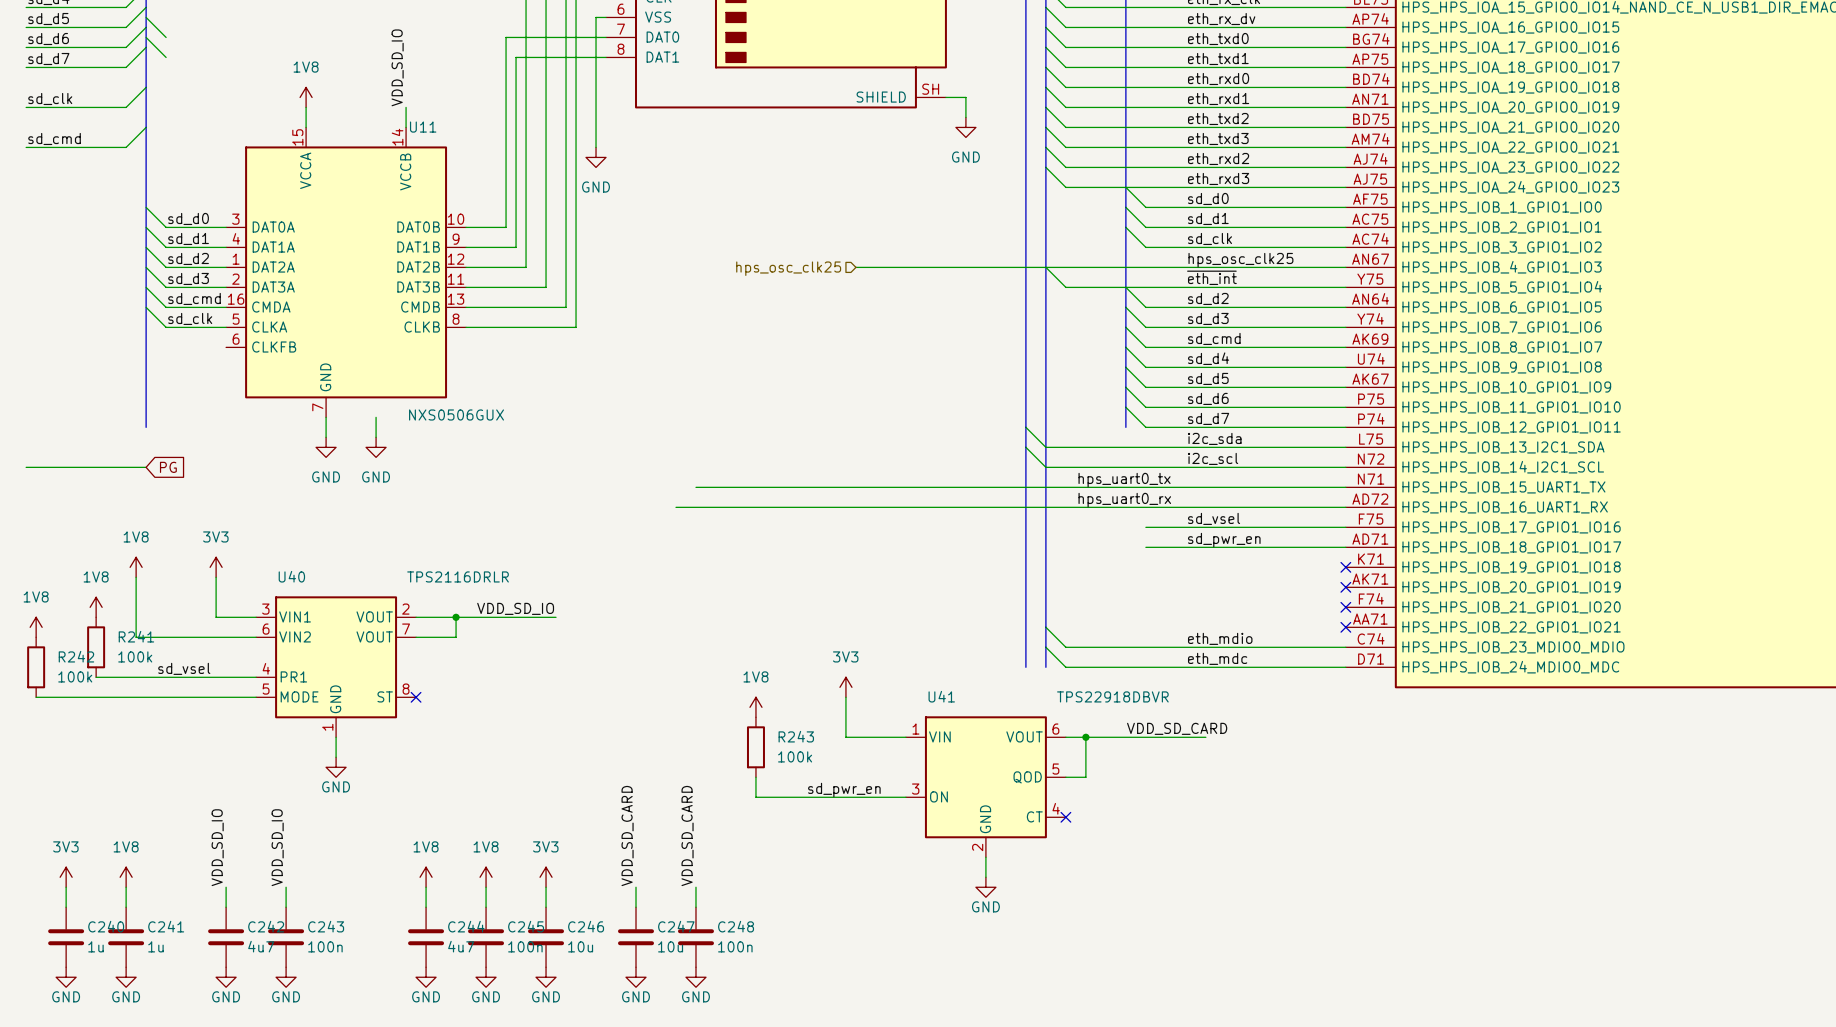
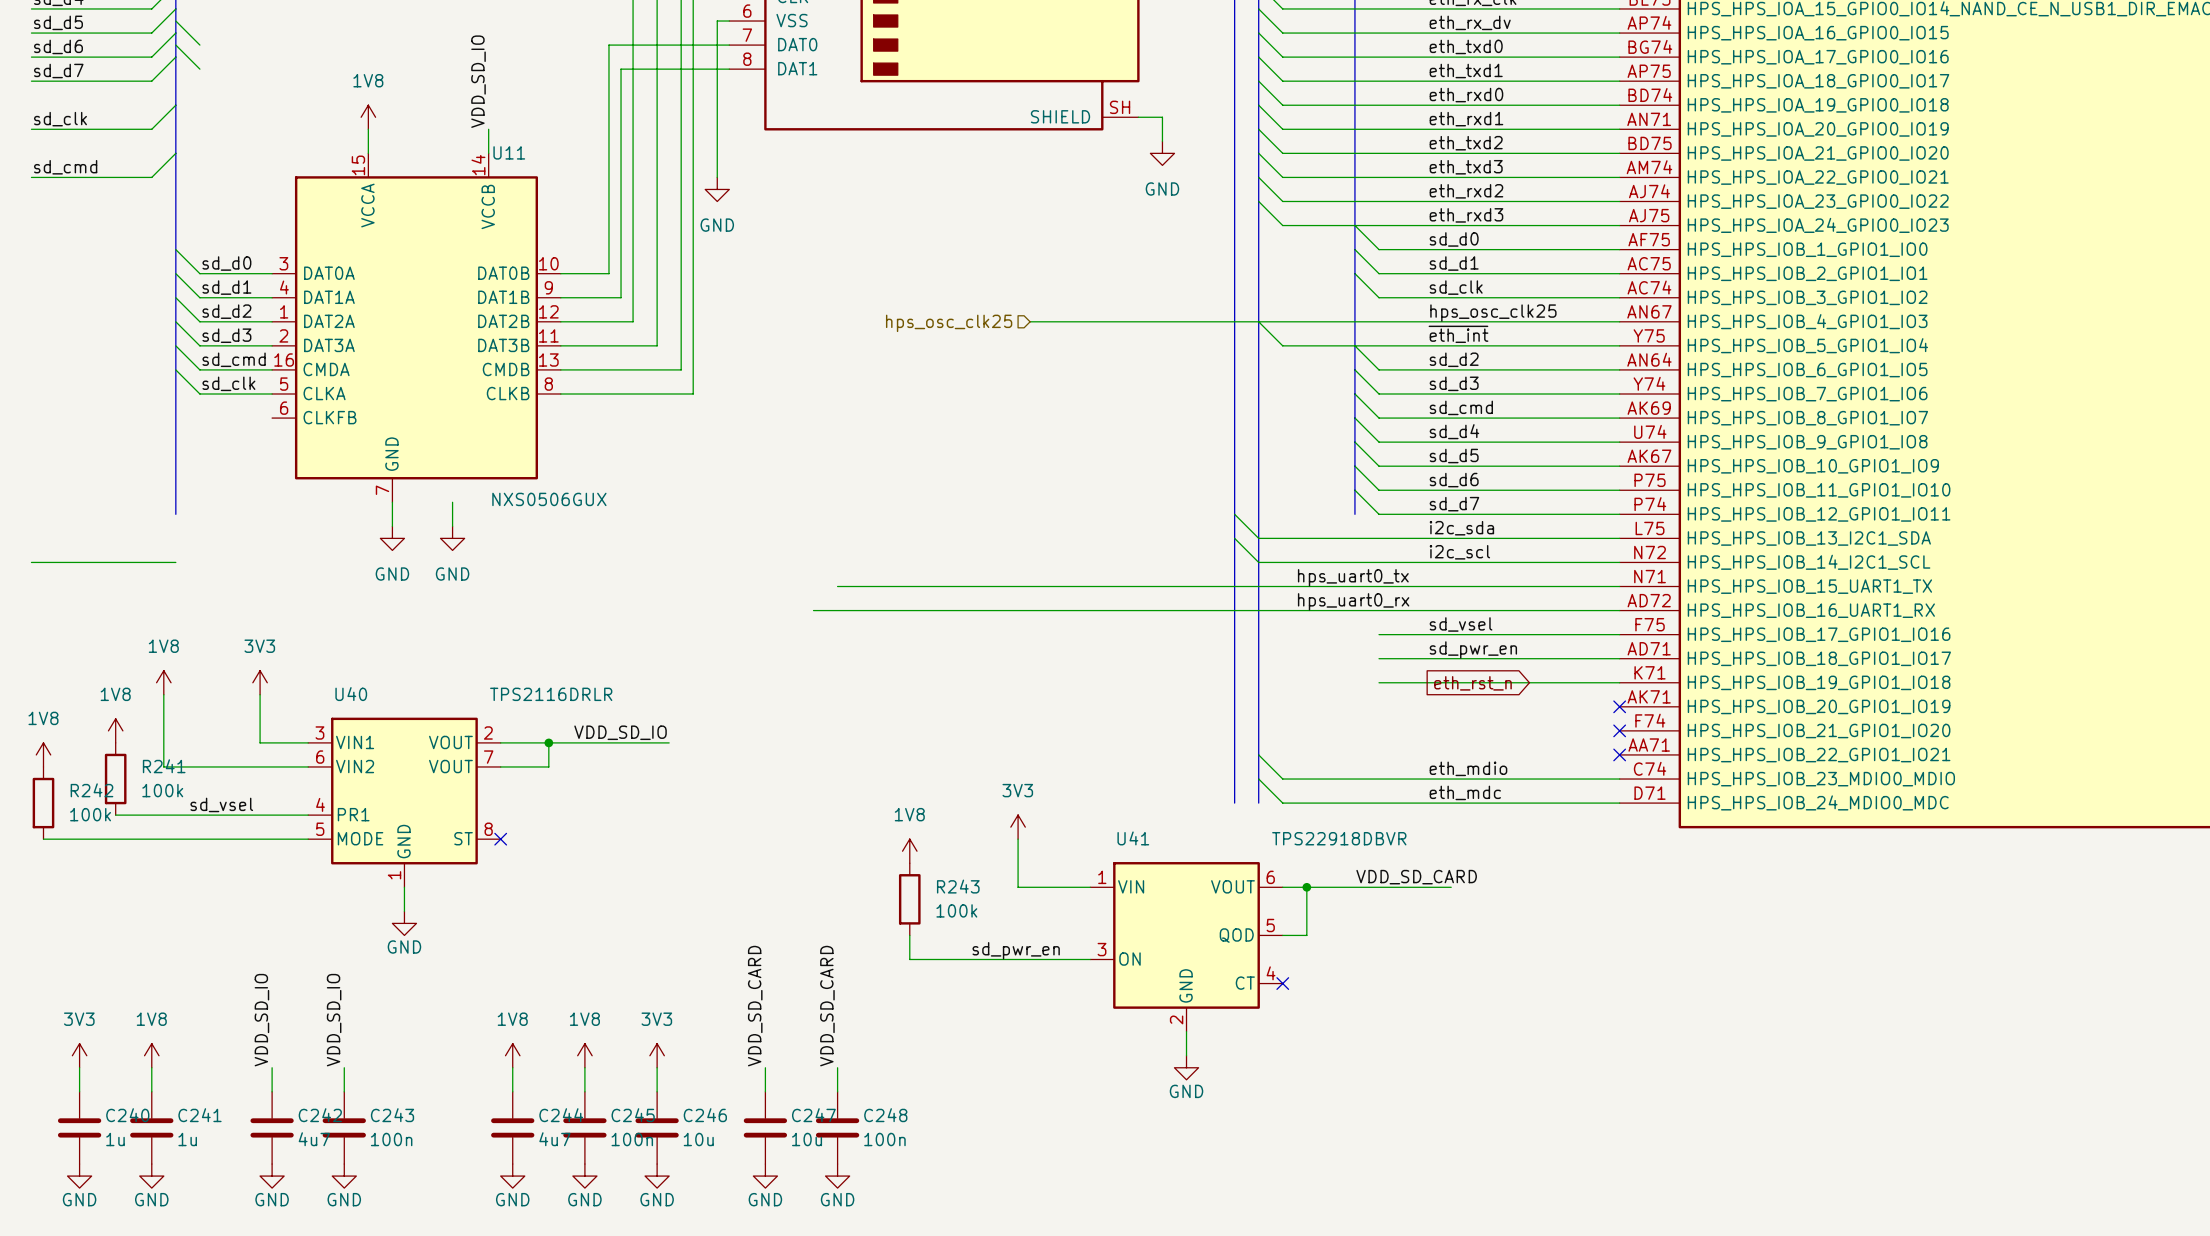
global label: PG (168, 467) -> none
wire: none -> (1379, 682) (1619, 682)
global label: none -> eth_rst_n (1473, 683)
no-connect mark: (1345, 567) -> none

